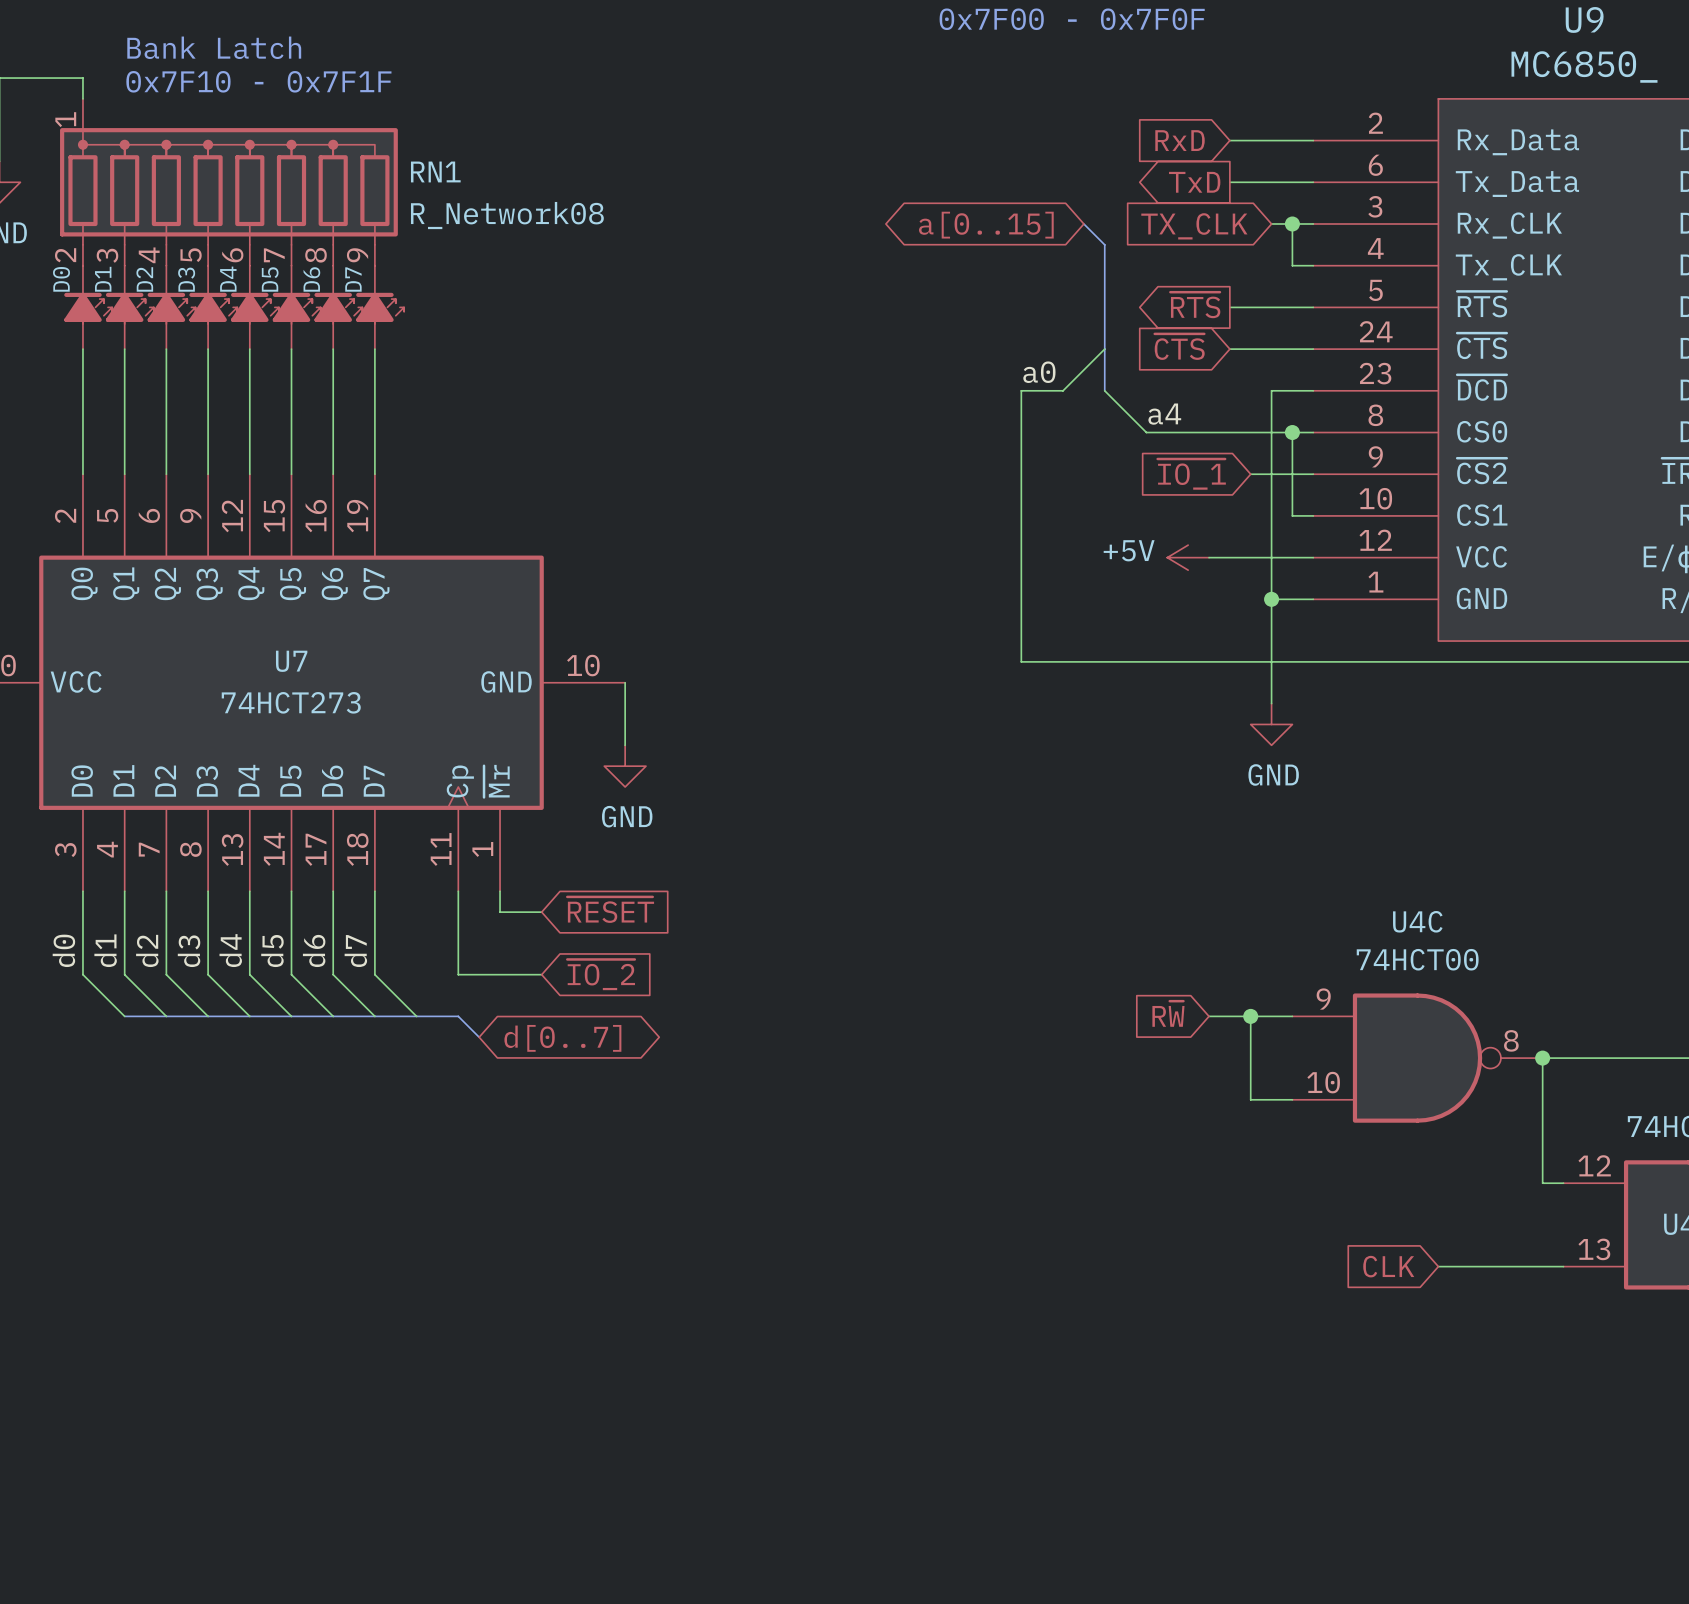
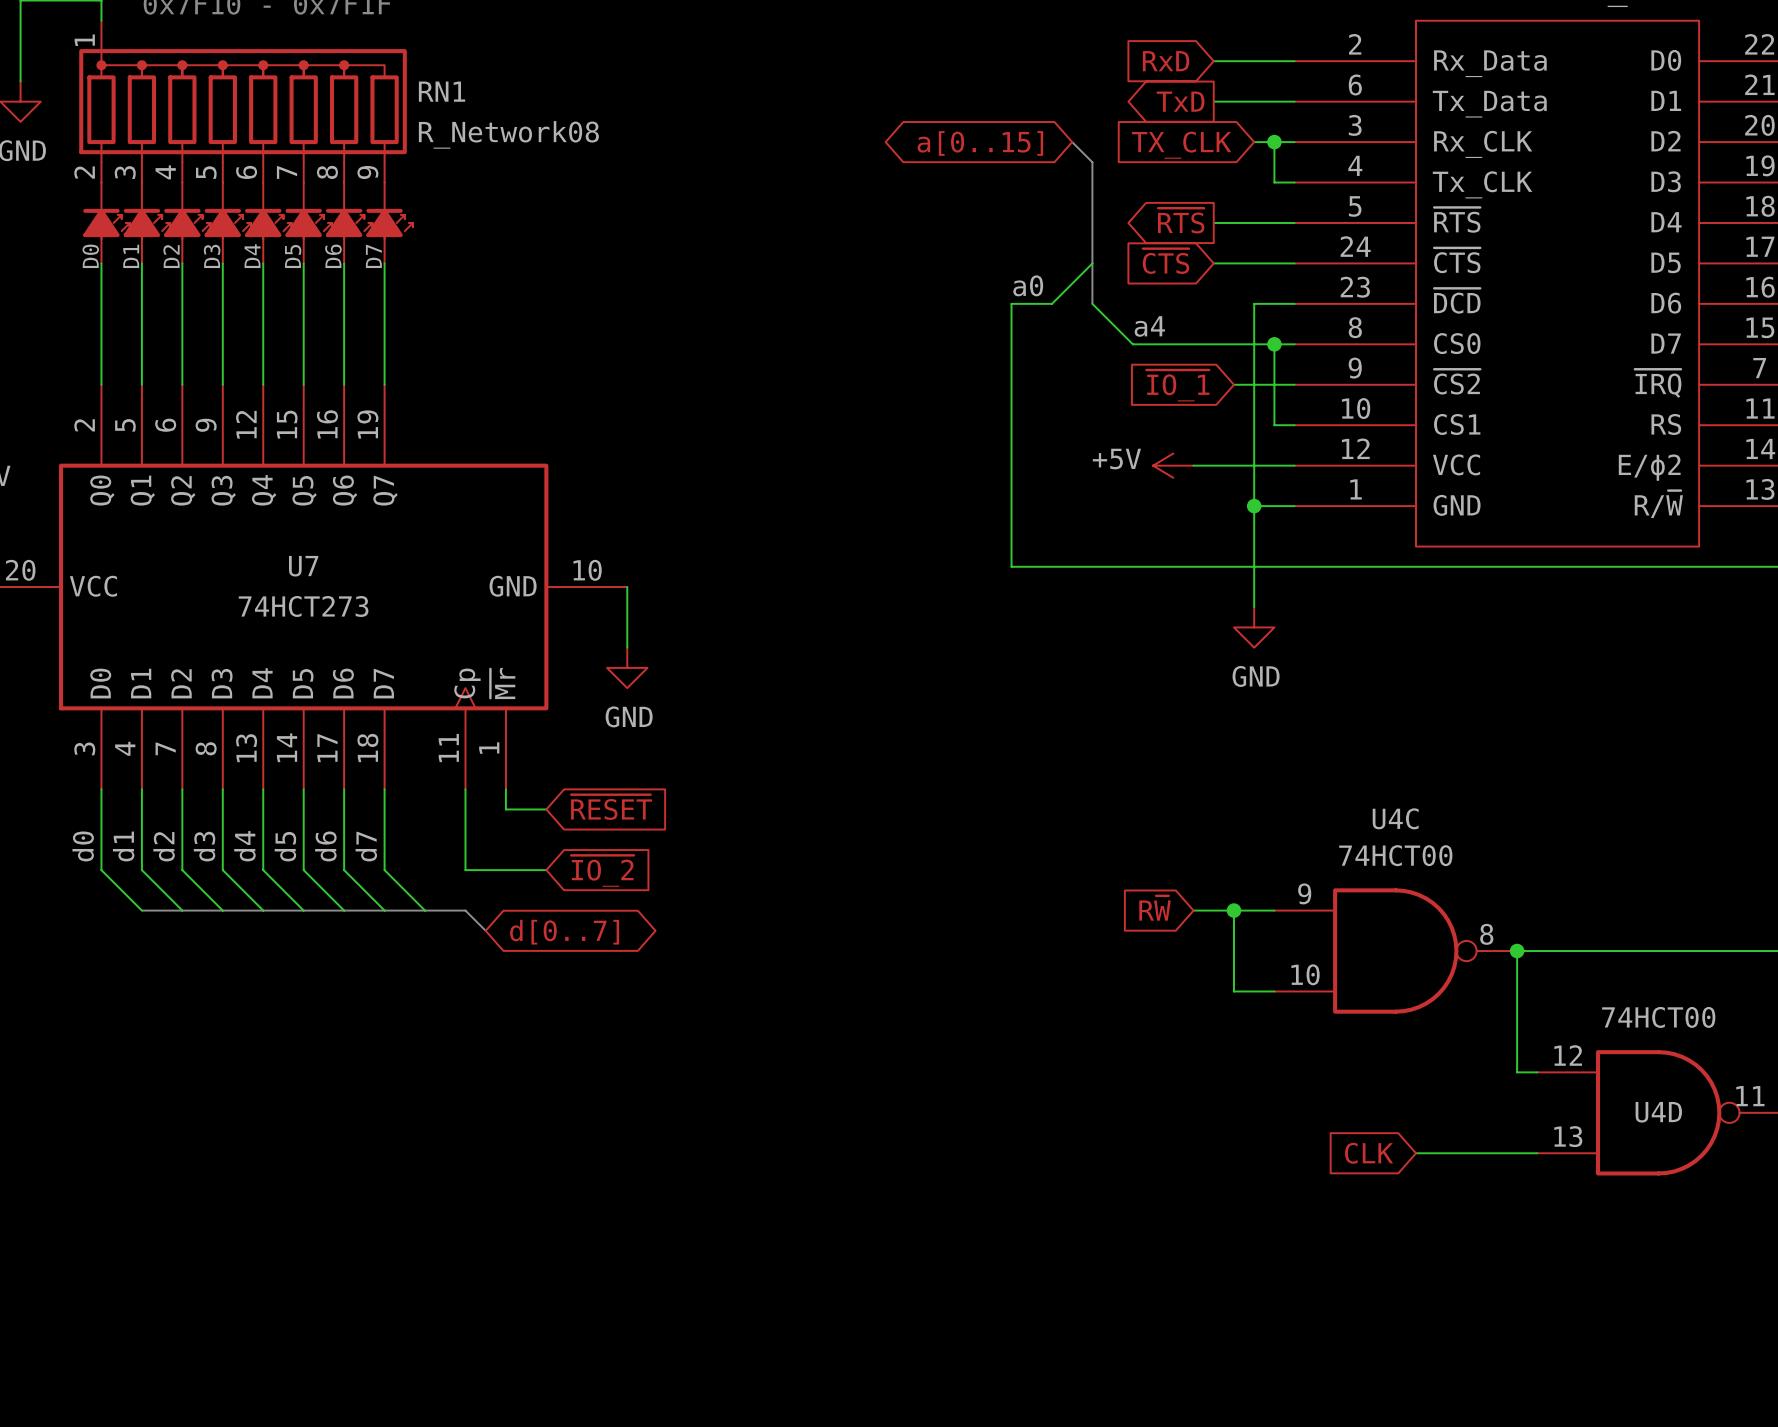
D0 name position: D0 (61, 279) -> D0 (90, 256)
D1 name position: D1 (103, 279) -> D1 (131, 256)
D2 name position: D2 (144, 279) -> D2 (171, 256)
D3 name position: D3 (186, 279) -> D3 (212, 256)
D4 name position: D4 (228, 279) -> D4 (252, 256)
D5 name position: D5 (270, 279) -> D5 (293, 256)
D6 name position: D6 (311, 279) -> D6 (333, 256)
D7 name position: D7 (353, 279) -> D7 (373, 256)

